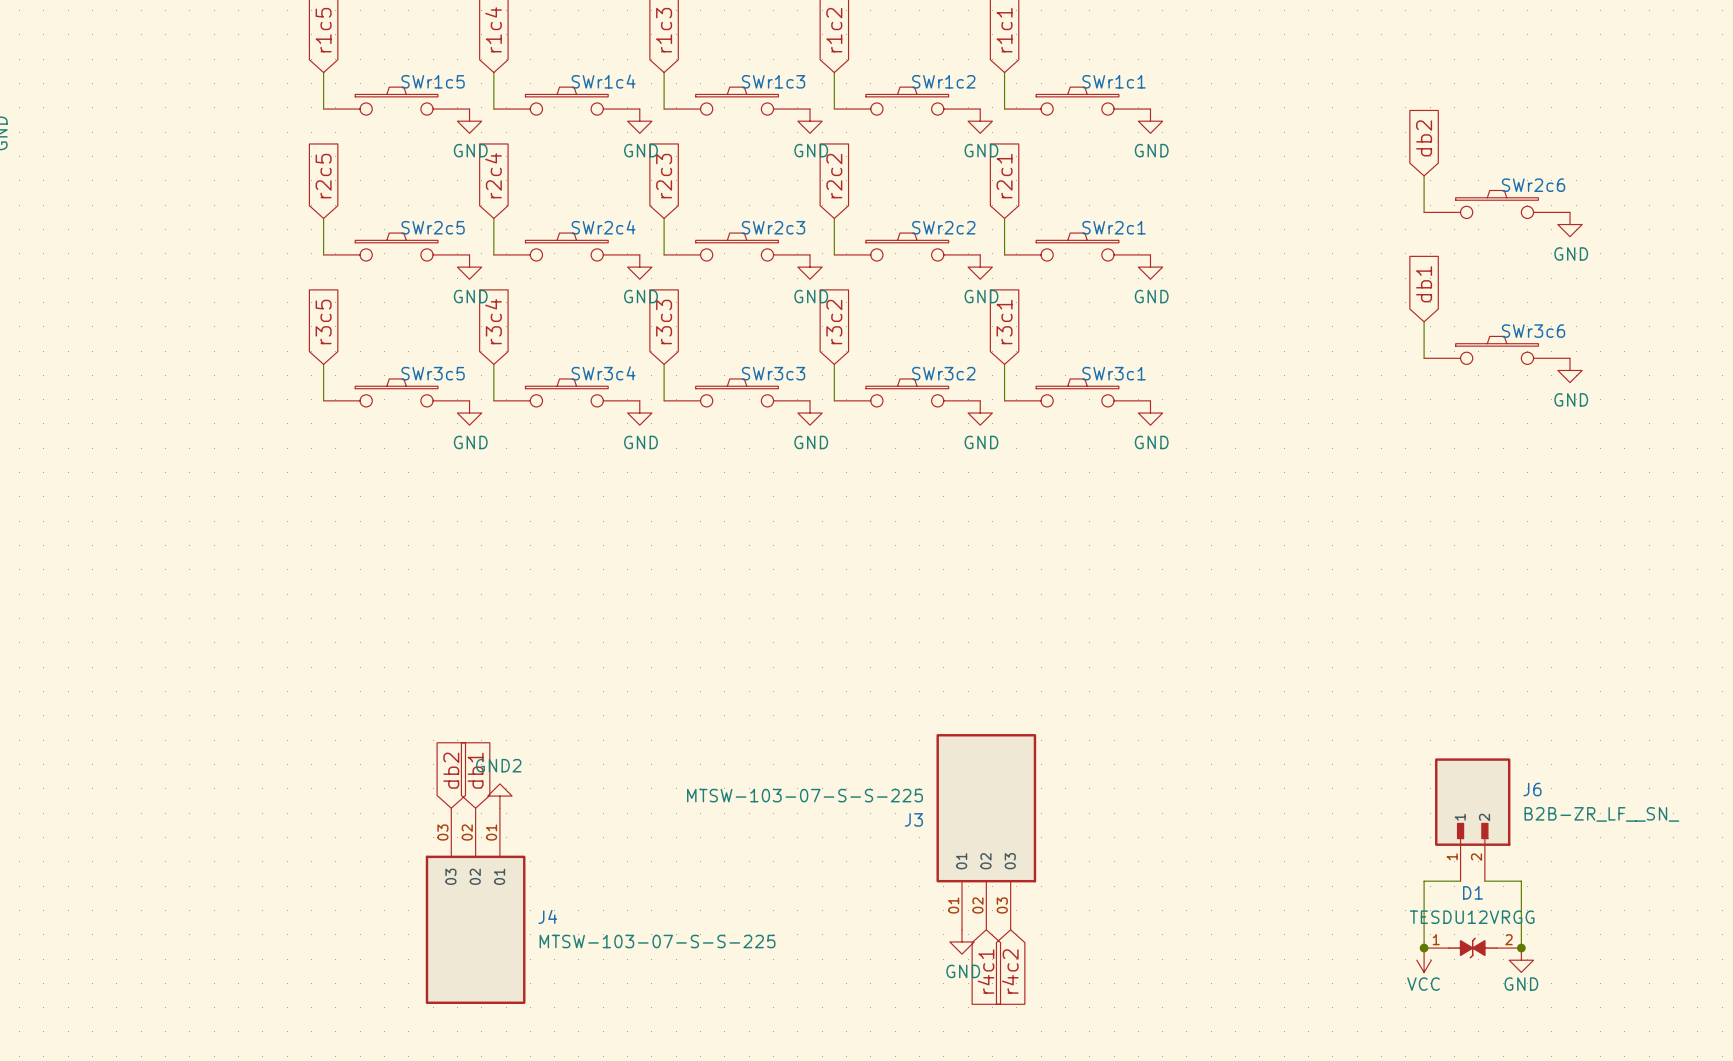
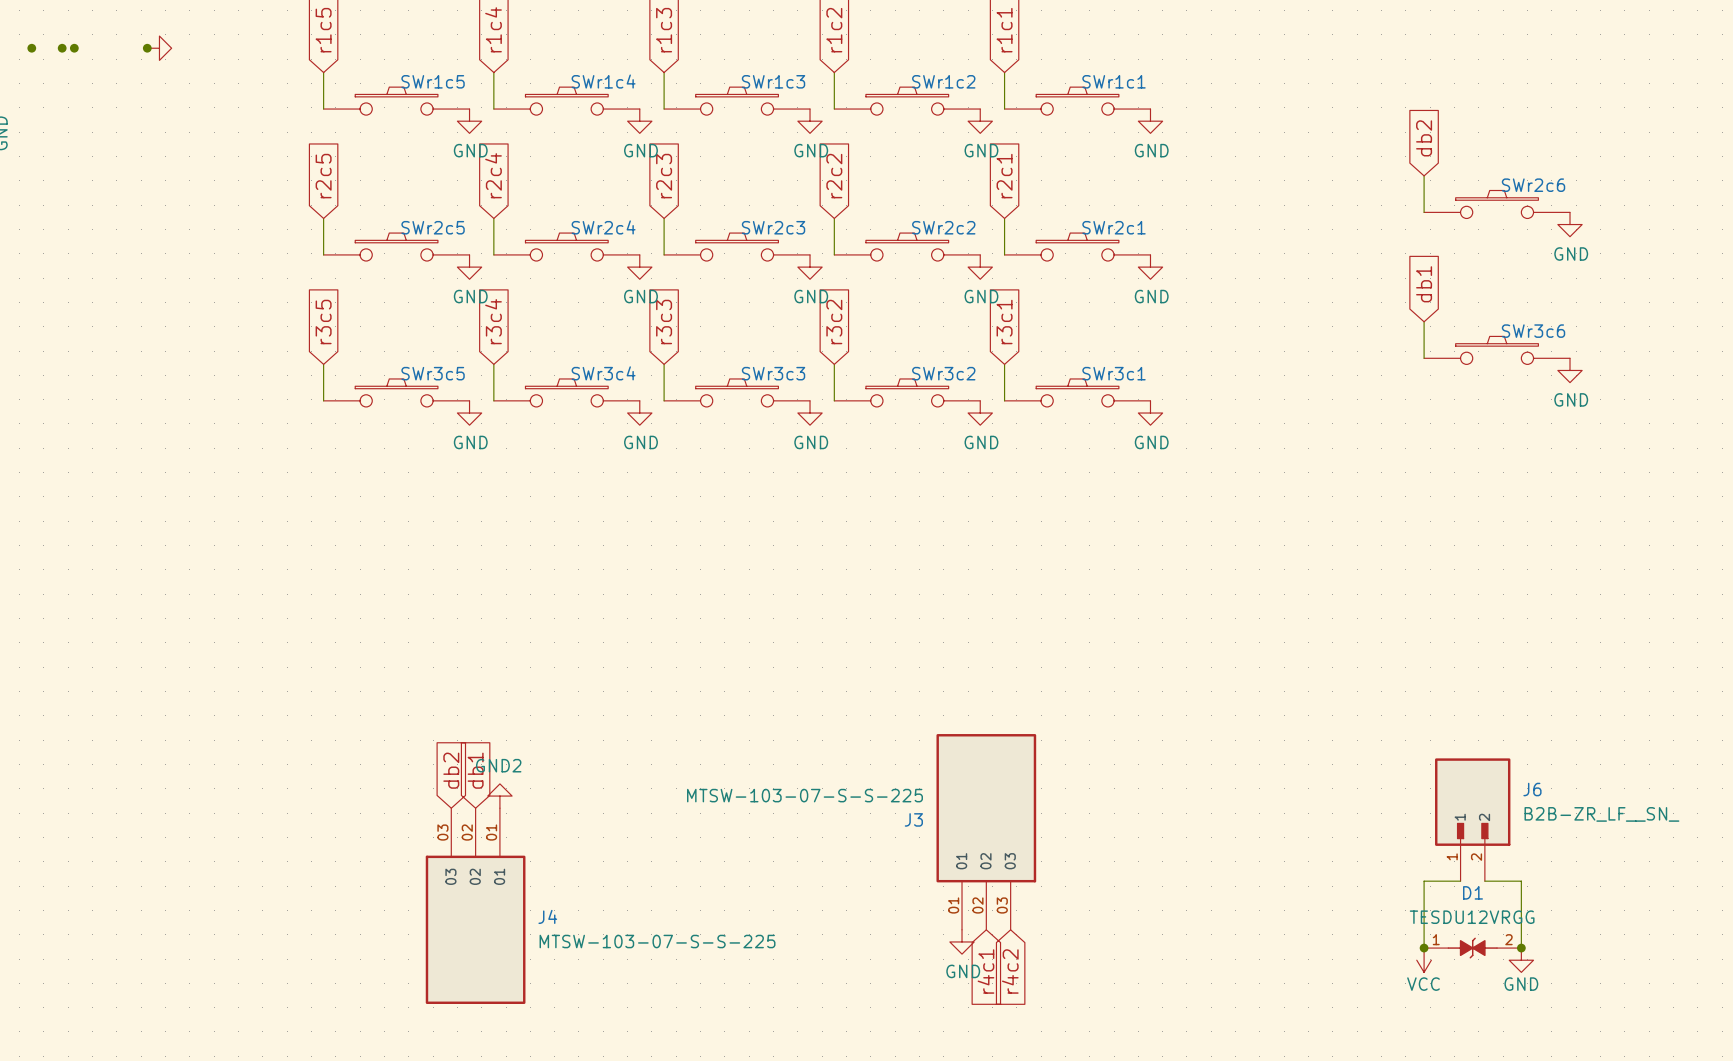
junction: none -> (31, 48)
junction: none -> (62, 48)
junction: none -> (74, 48)
junction: none -> (147, 48)
power symbol: none -> (159, 48)

